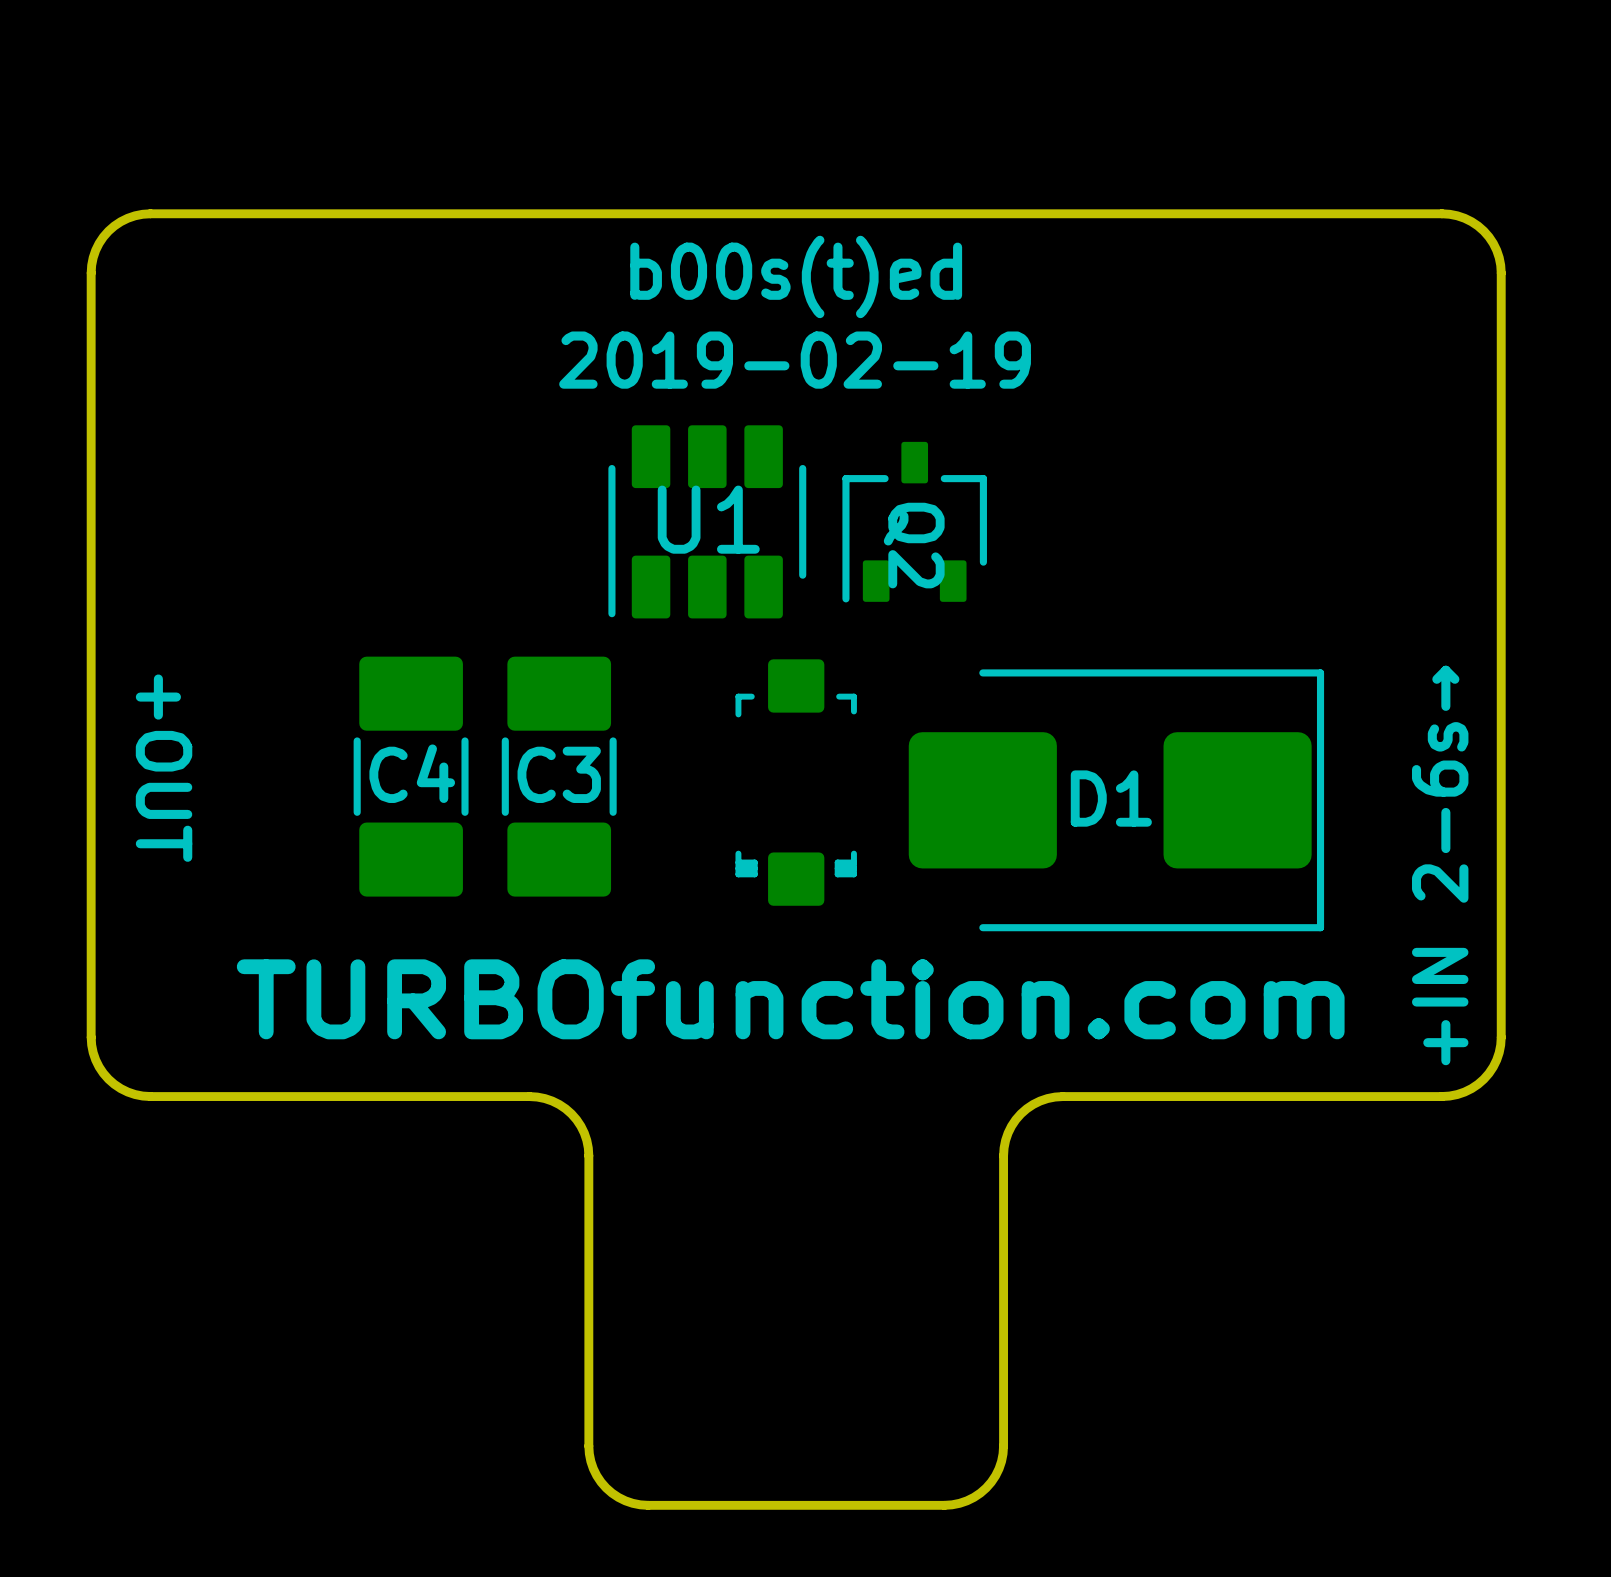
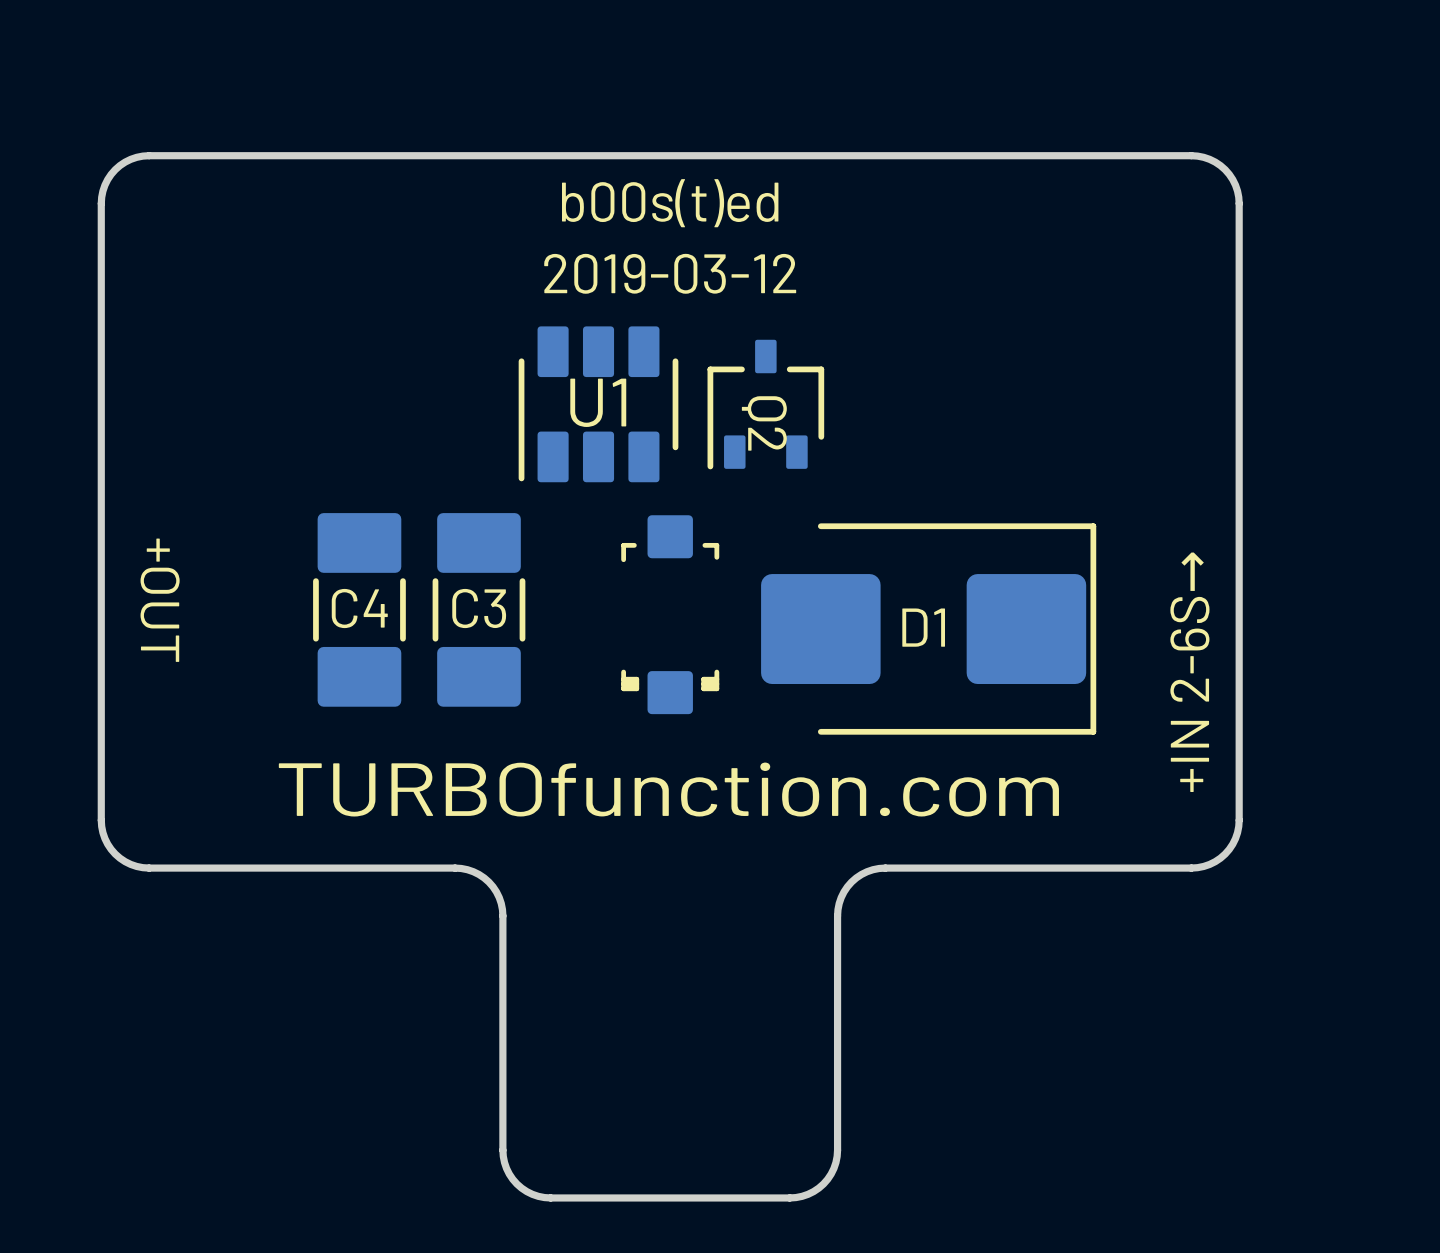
text: 2019-02-19 (795, 360) -> 2019-03-12 (670, 273)
text: +IN 2-6s→ (1440, 865) -> +IN 2-6S→ (1189, 672)

